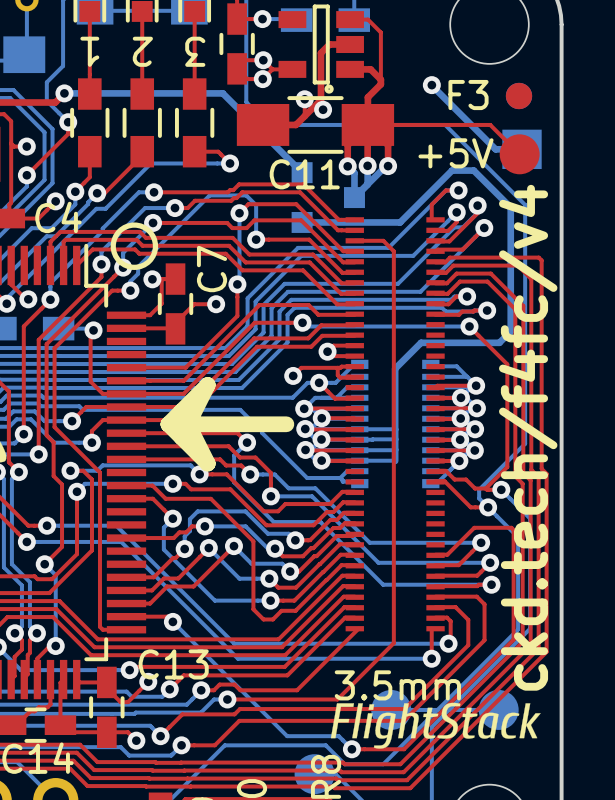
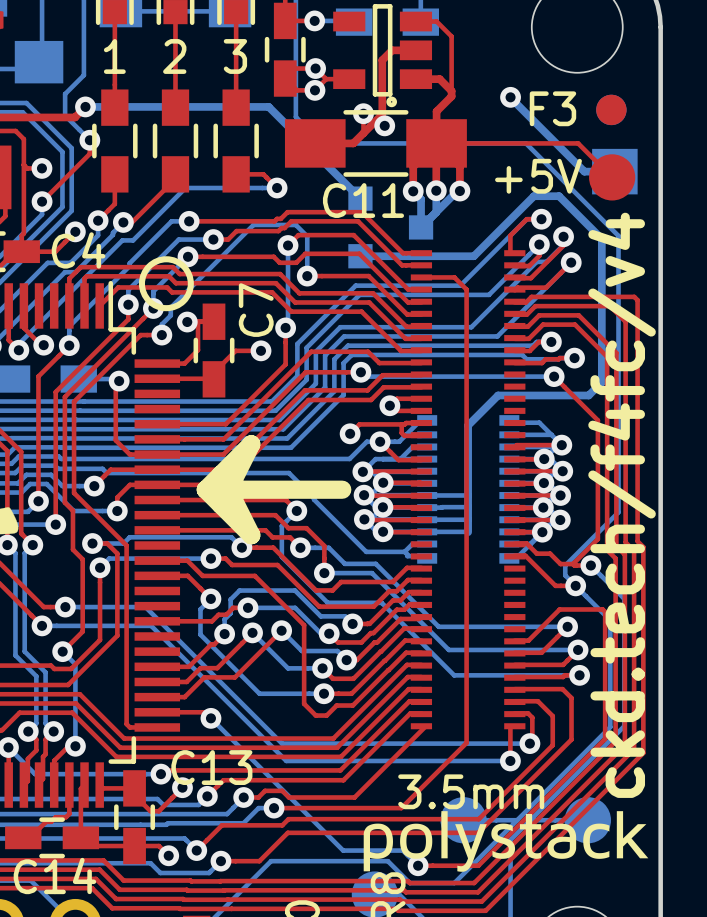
text rotation: 0° (89, 51) -> 180° (114, 56)
text rotation: 0° (142, 51) -> 180° (174, 56)
text rotation: 0° (195, 51) -> 180° (235, 56)
drawing shape: [330, 702, 541, 749] -> [363, 811, 649, 872]

